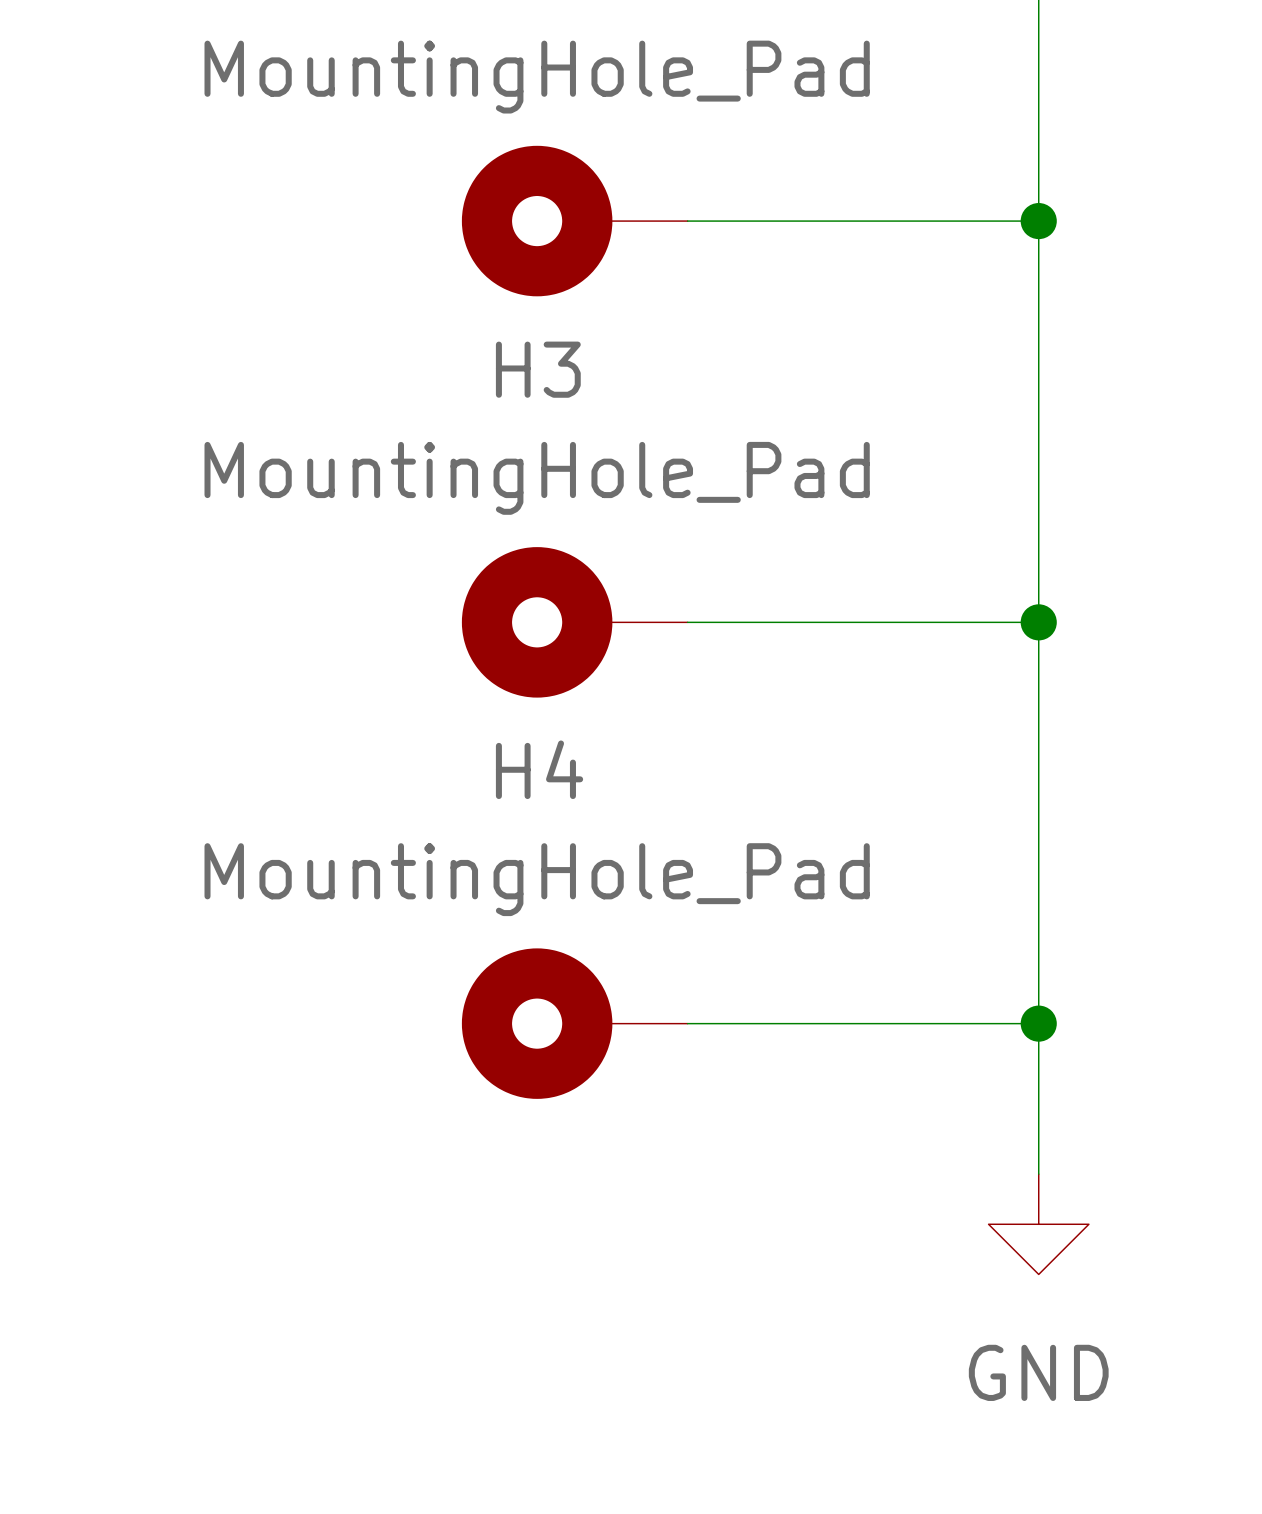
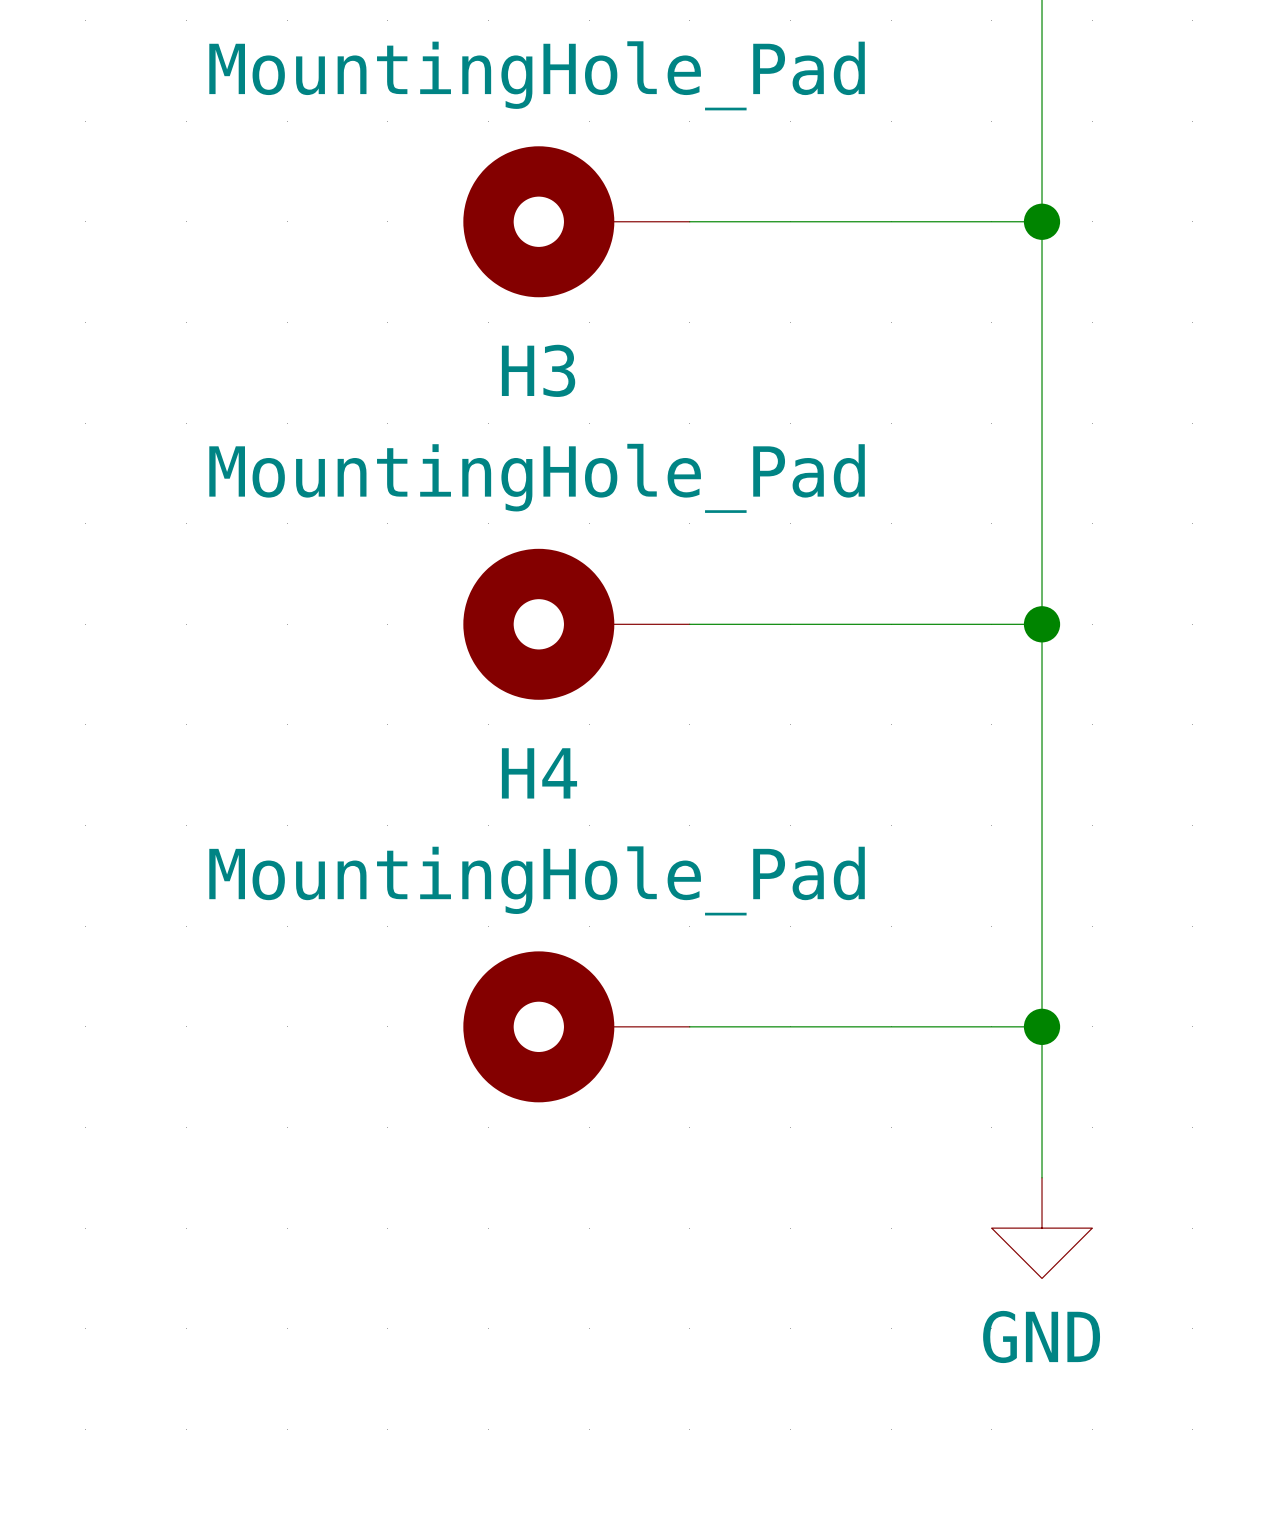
power symbol text position: GND (1038, 1372) -> GND (1041, 1336)

